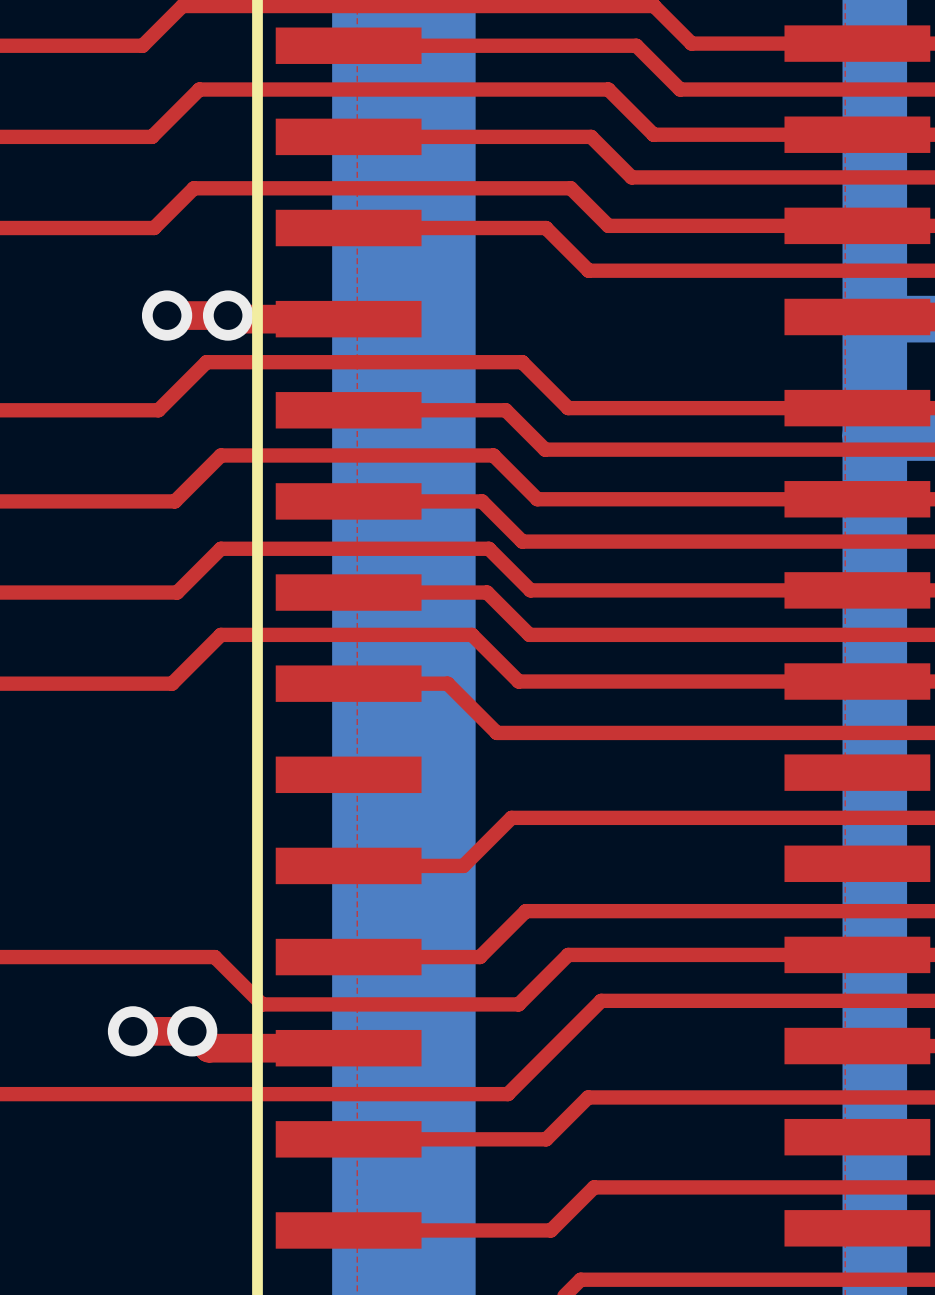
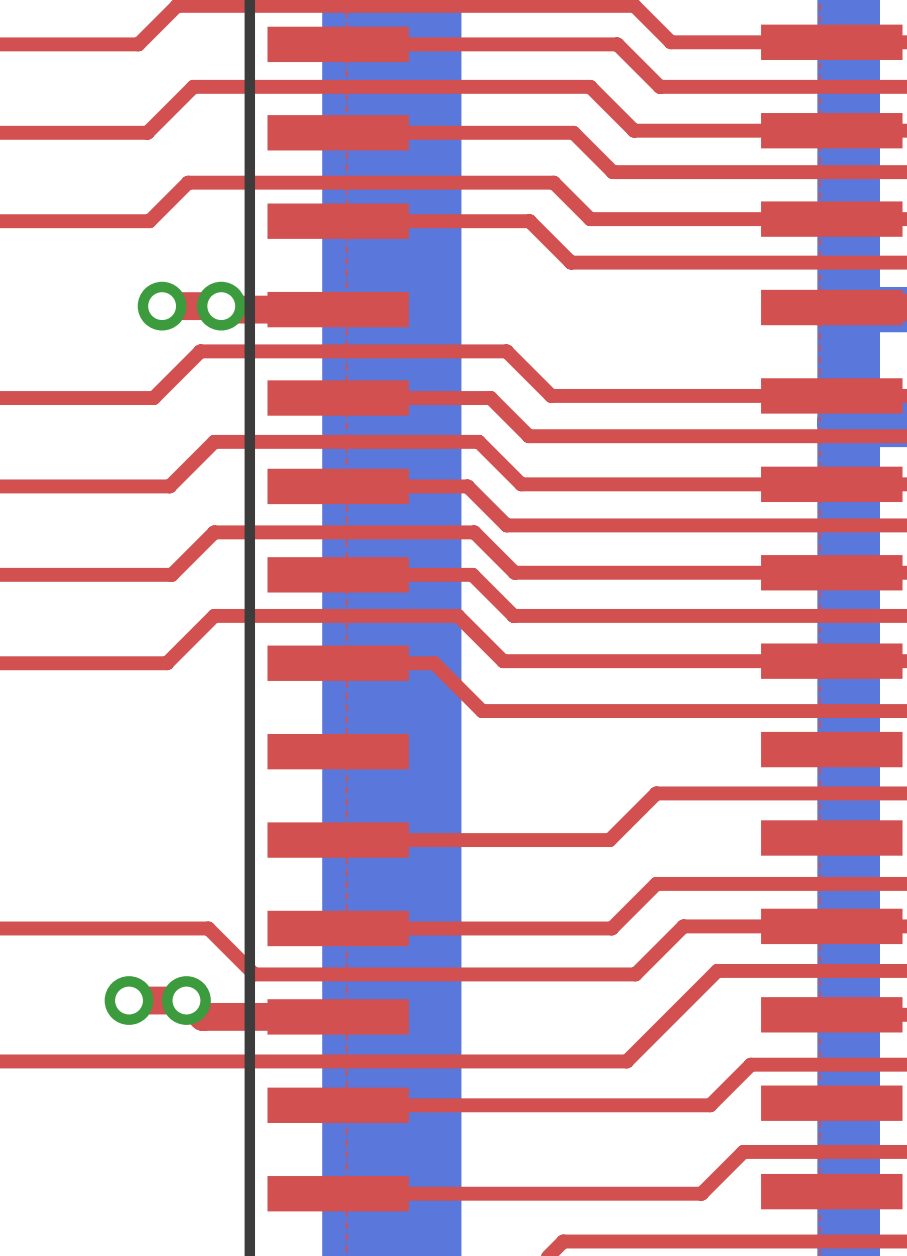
top track: (676, 817) (511, 817) (463, 865) -> (656, 793) (609, 840) (449, 840)
top track: (676, 911) (525, 911) (479, 957) -> (656, 883) (611, 928) (465, 928)
top track: (704, 954) (568, 954) (518, 1004) -> (683, 926) (635, 974) (503, 974)
top track: (739, 1000) (601, 1000) (507, 1094) -> (717, 970) (626, 1061) (492, 1061)
top track: (774, 1097) (588, 1097) (546, 1139) -> (750, 1064) (710, 1105) (529, 1105)
top track: (766, 1187) (594, 1187) (550, 1230) -> (743, 1151) (701, 1193) (534, 1193)

